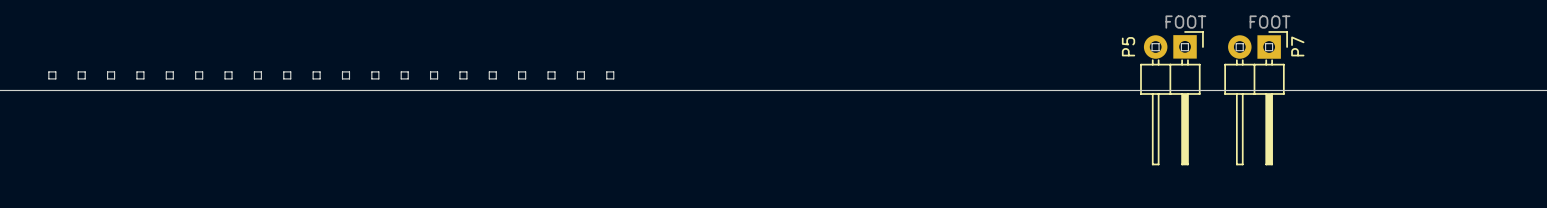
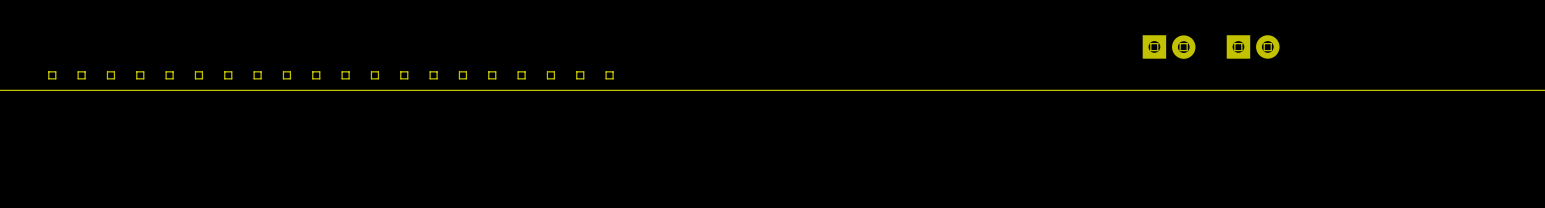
P5 side: top (1171, 98) -> bottom (1169, 47)
P7 side: top (1256, 98) -> bottom (1253, 46)

